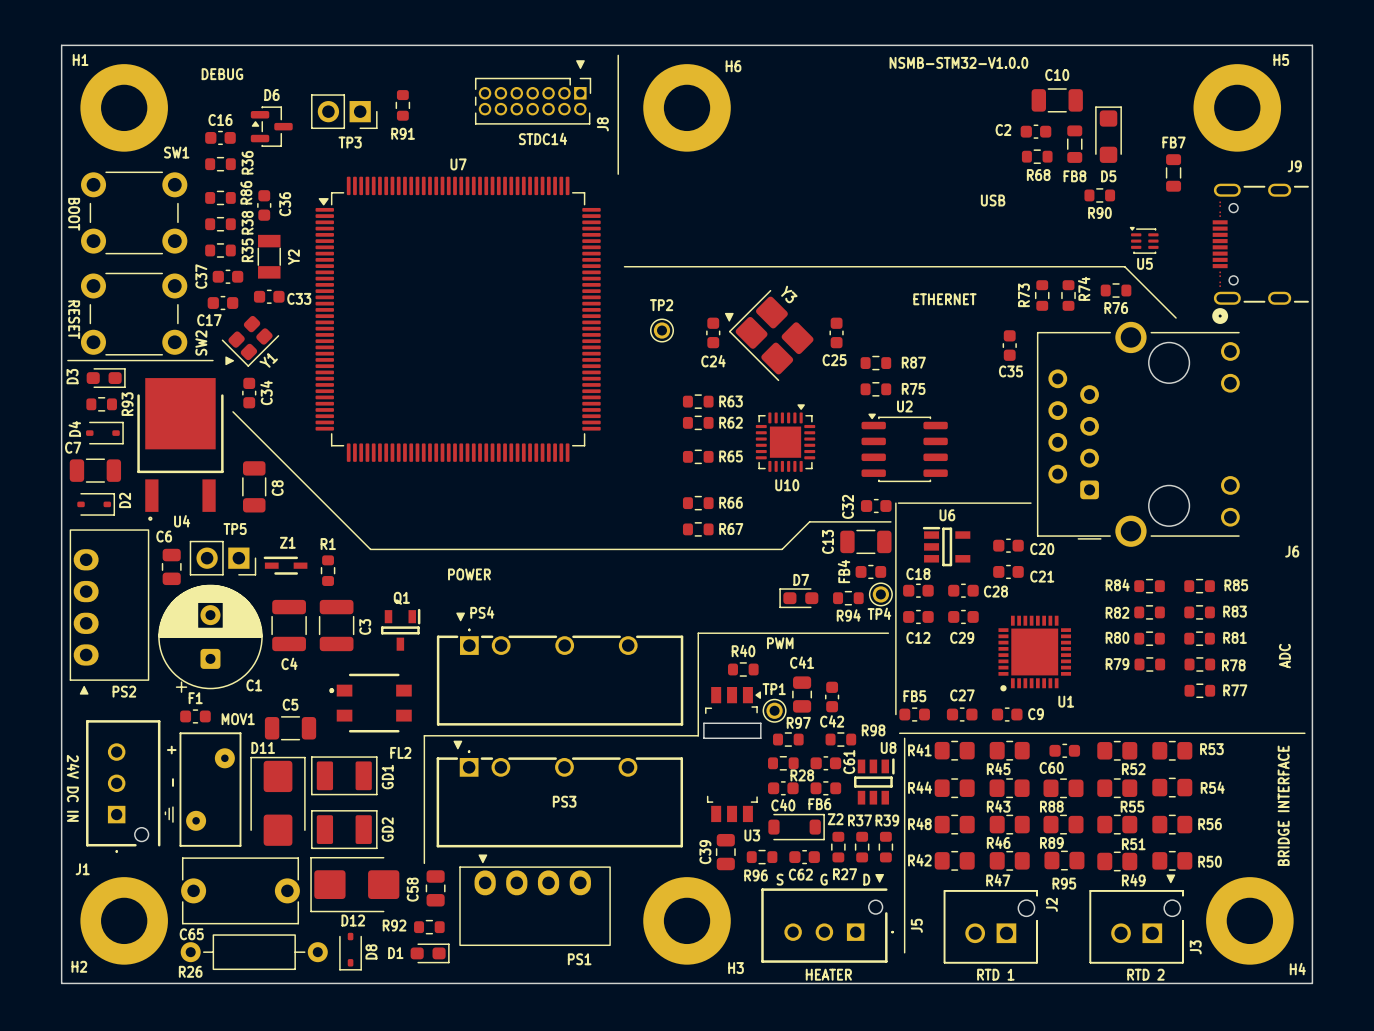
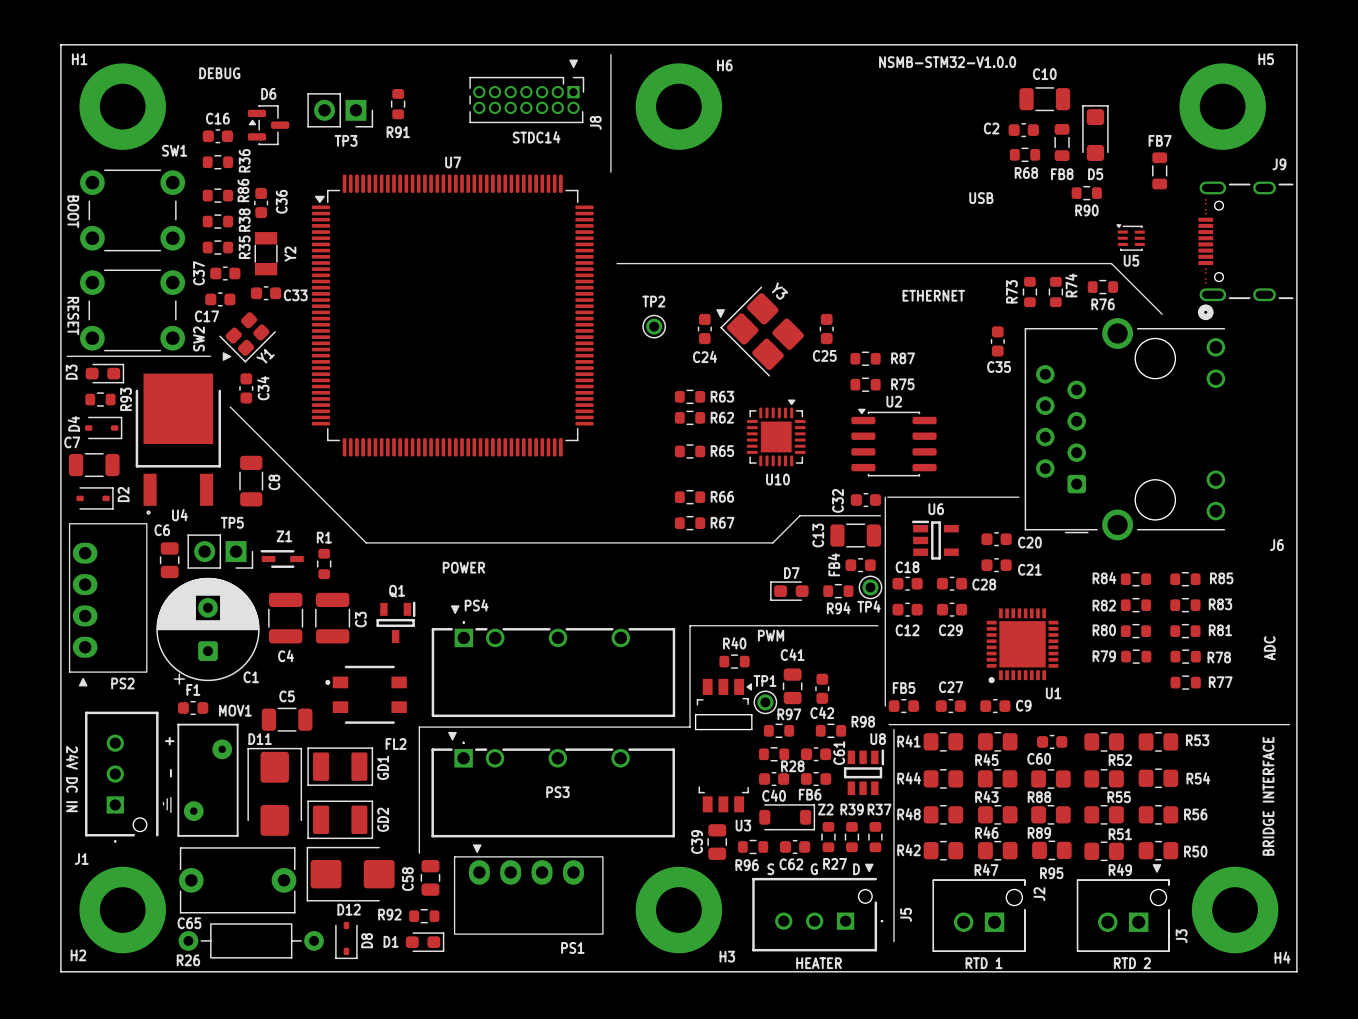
R37 name: R37 (860, 820) -> R39 (852, 809)
R39 name: R39 (887, 820) -> R37 (879, 809)

